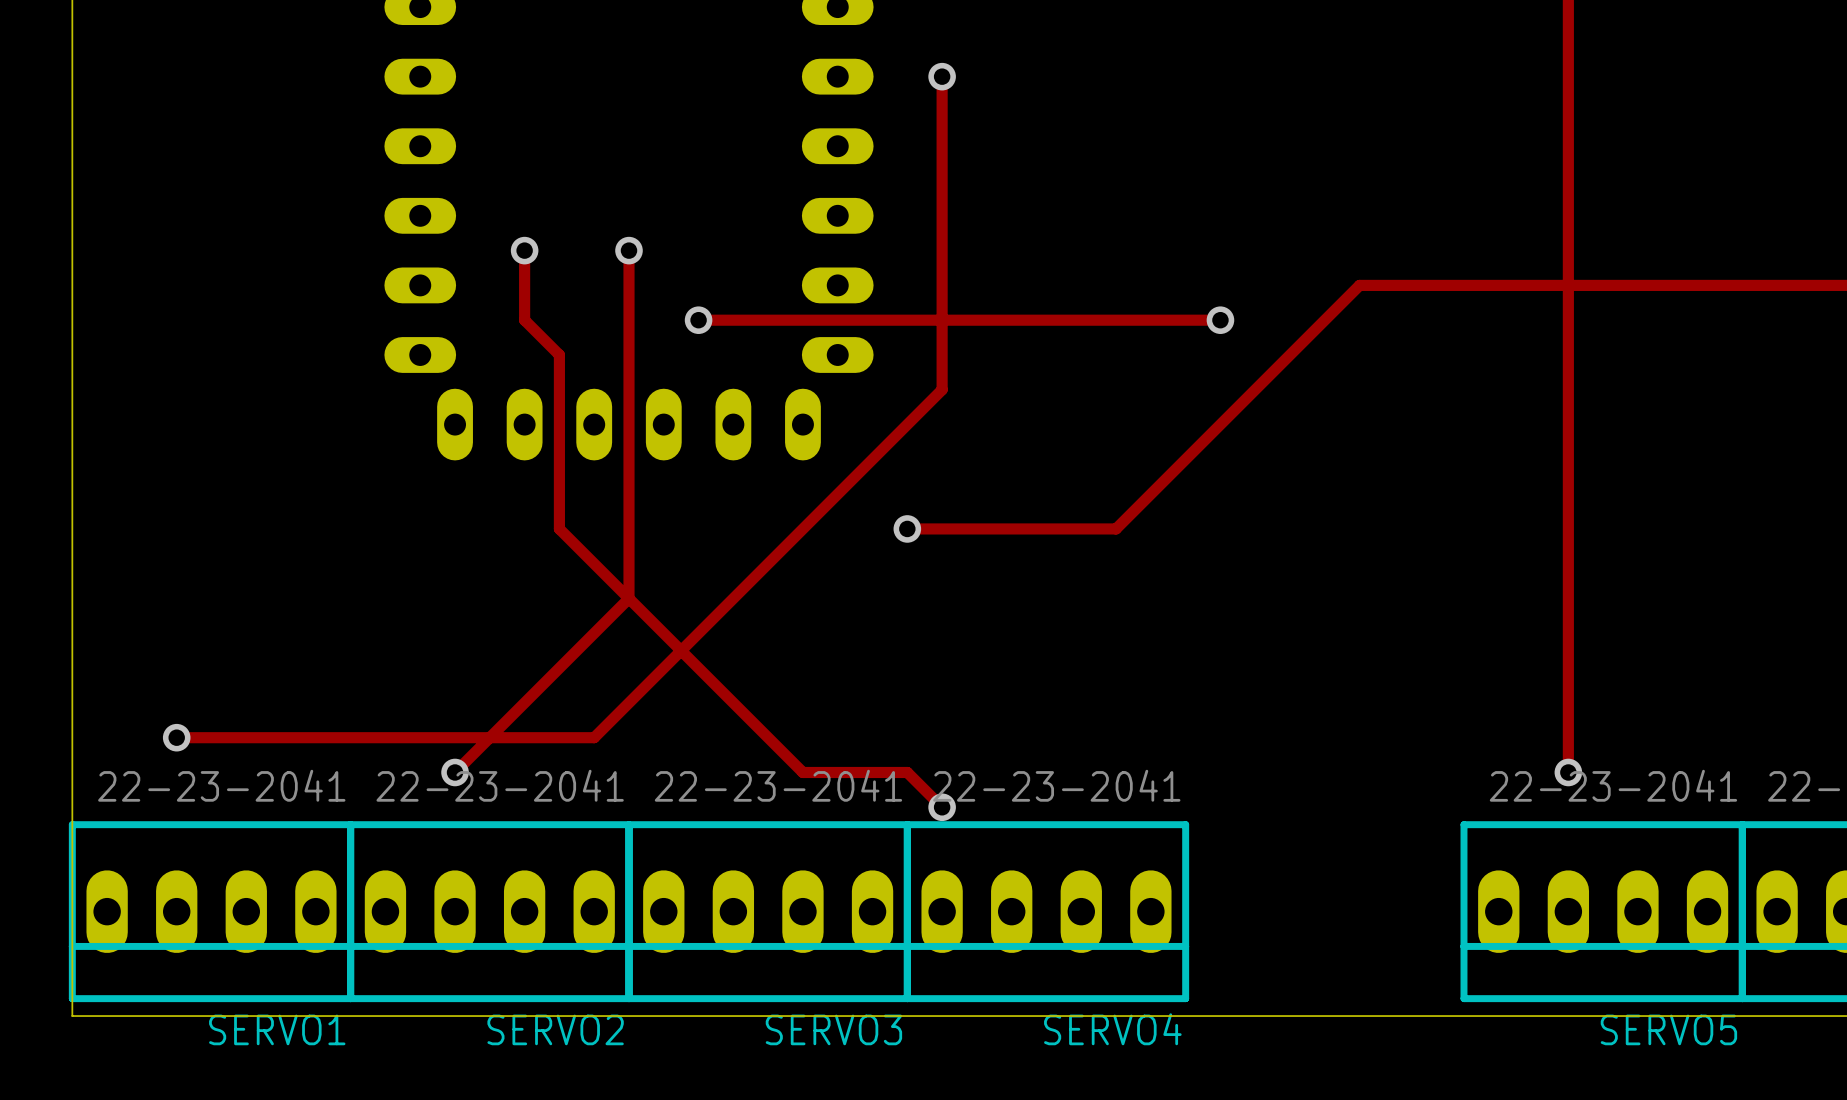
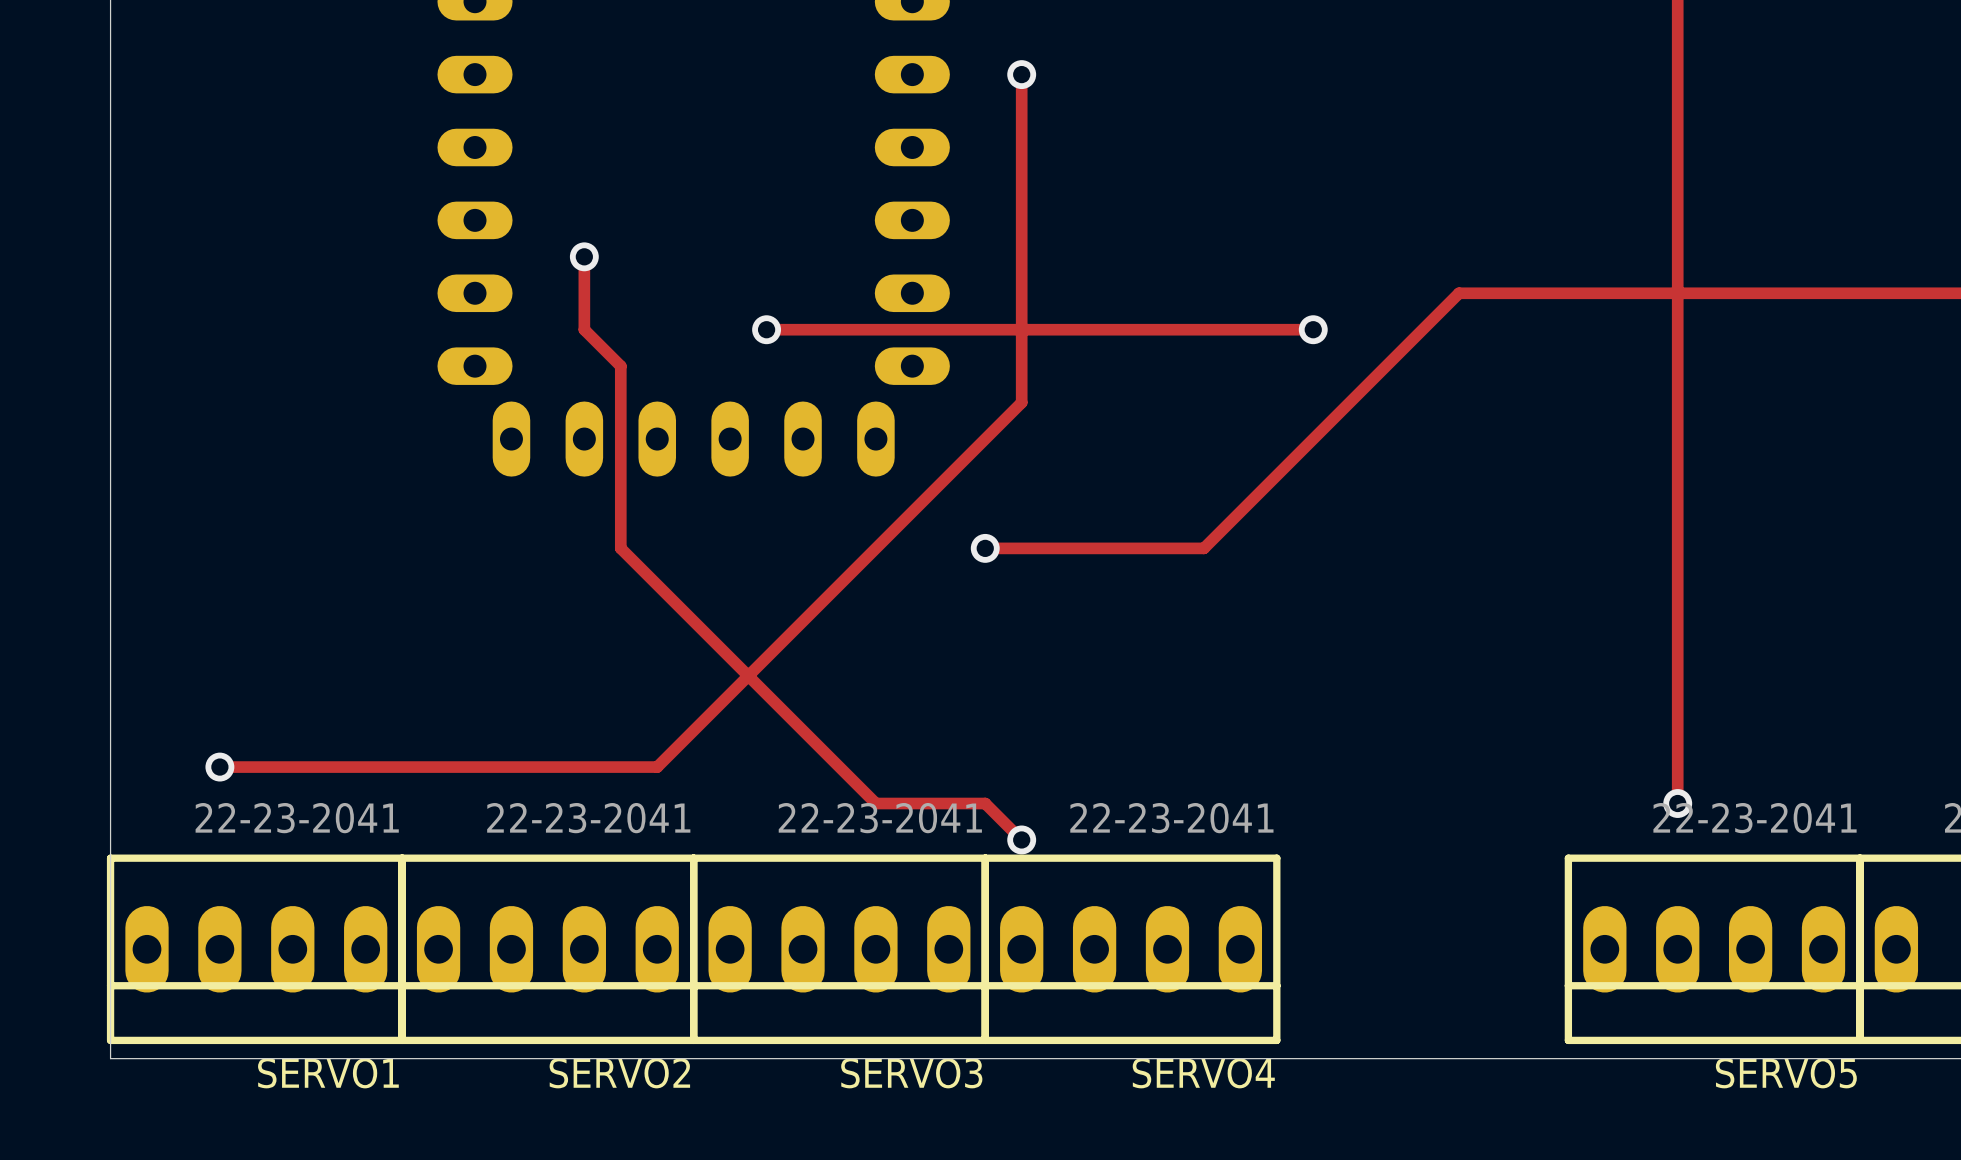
track: (629, 250) (629, 598) (455, 772) -> none
via: (629, 250) -> none
via: (455, 772) -> none

